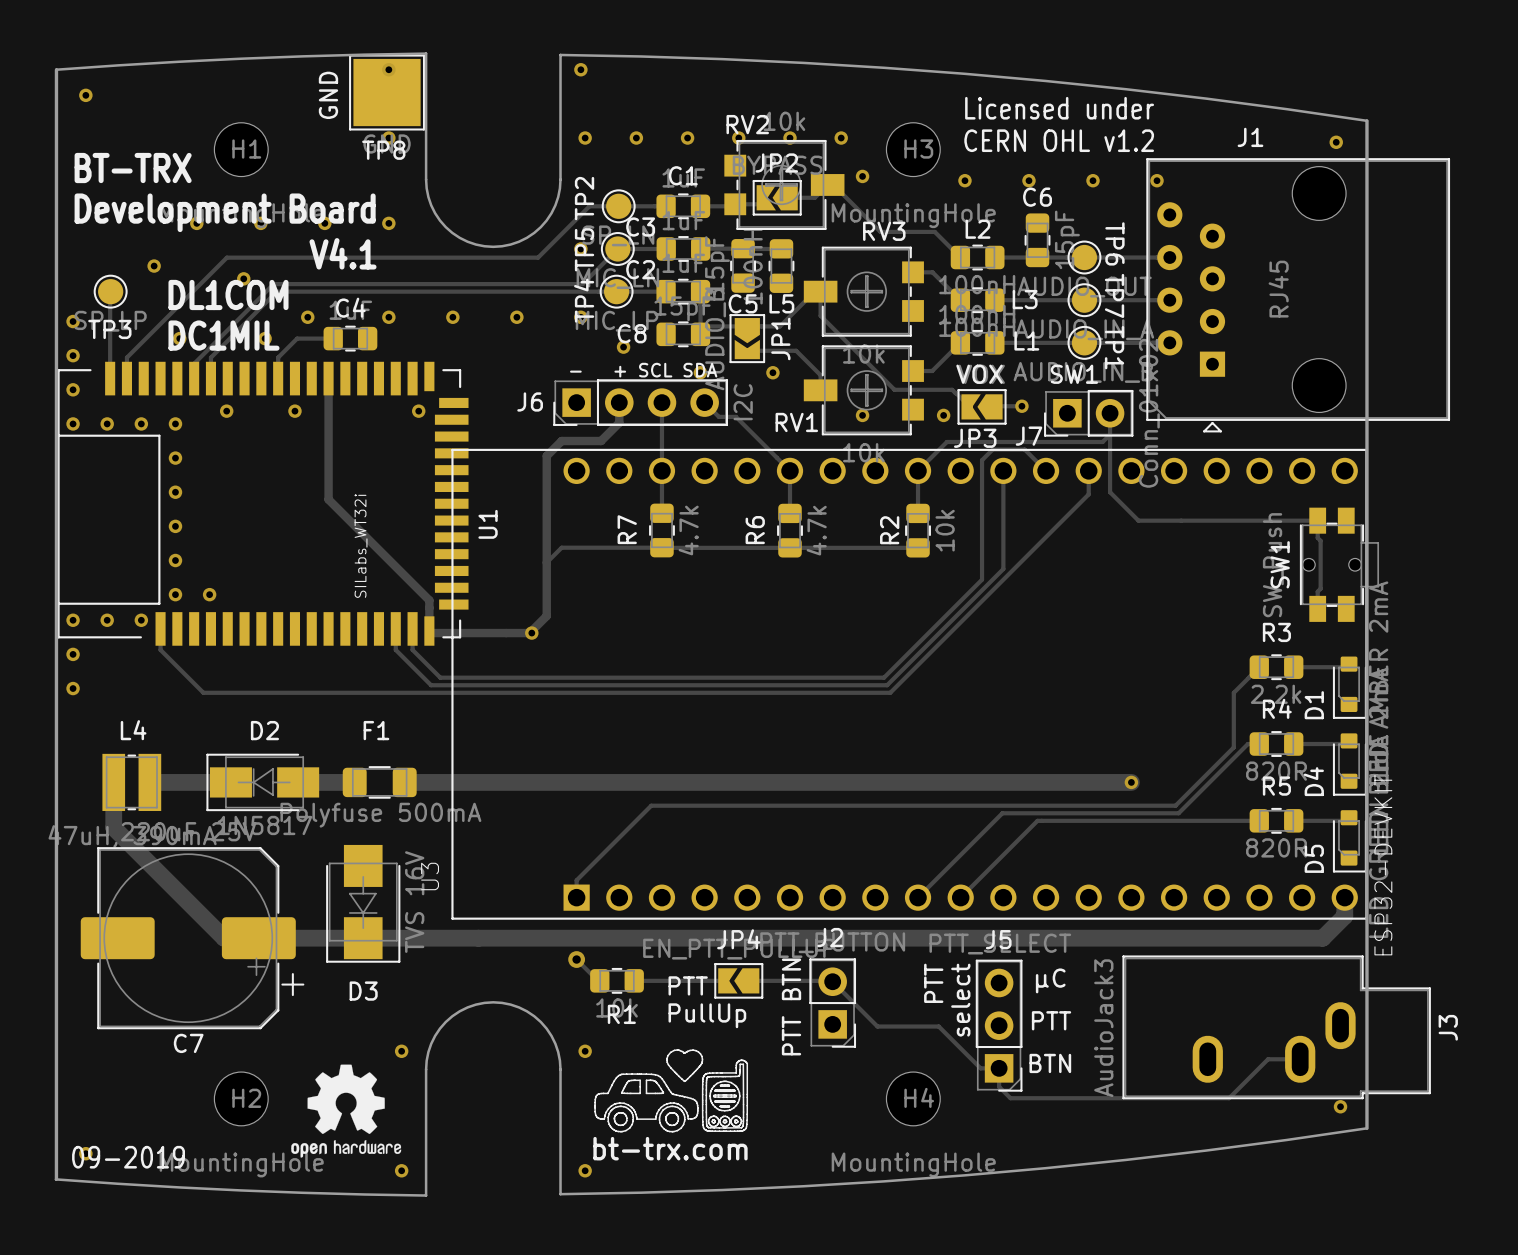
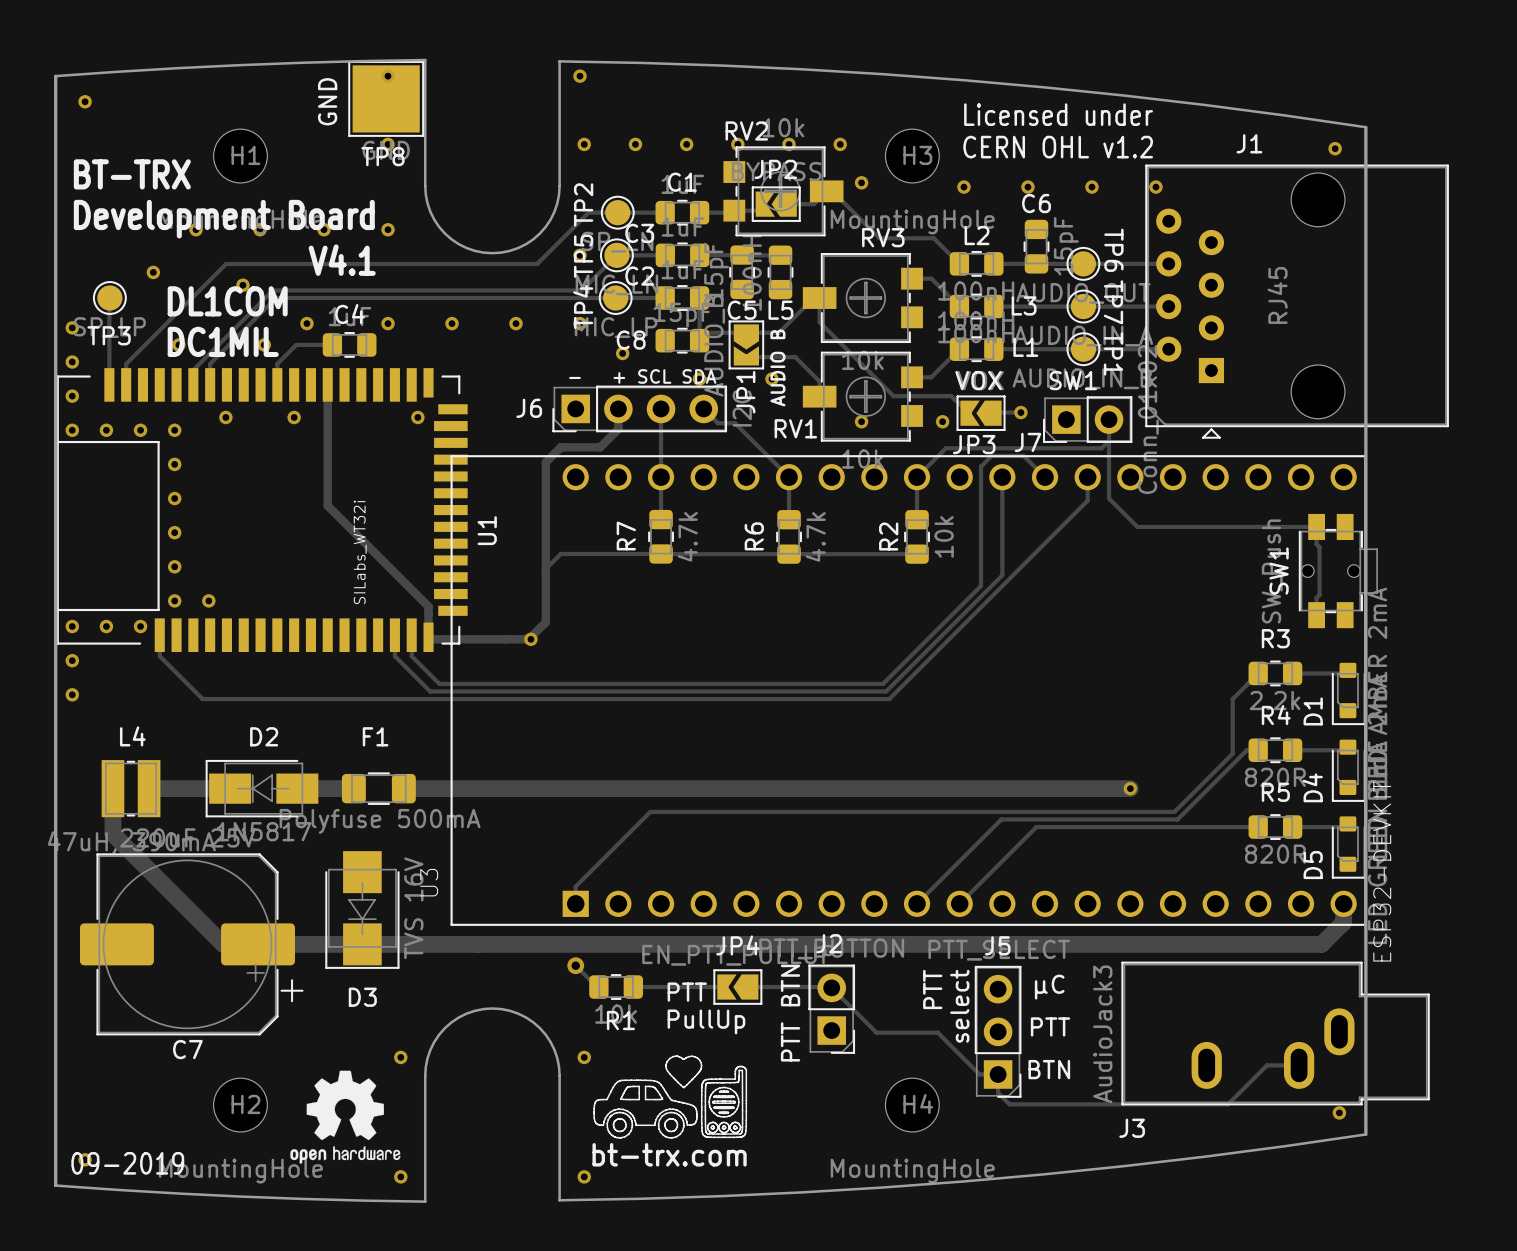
JP1 name position: JP1 (780, 339) -> JP1 (745, 392)
text: none -> AUDIO B (777, 367)
J3 name rotation: 0° (1448, 1027) -> 90° clockwise (1132, 1128)
J3 name position: J3 (1448, 1027) -> J3 (1132, 1128)

